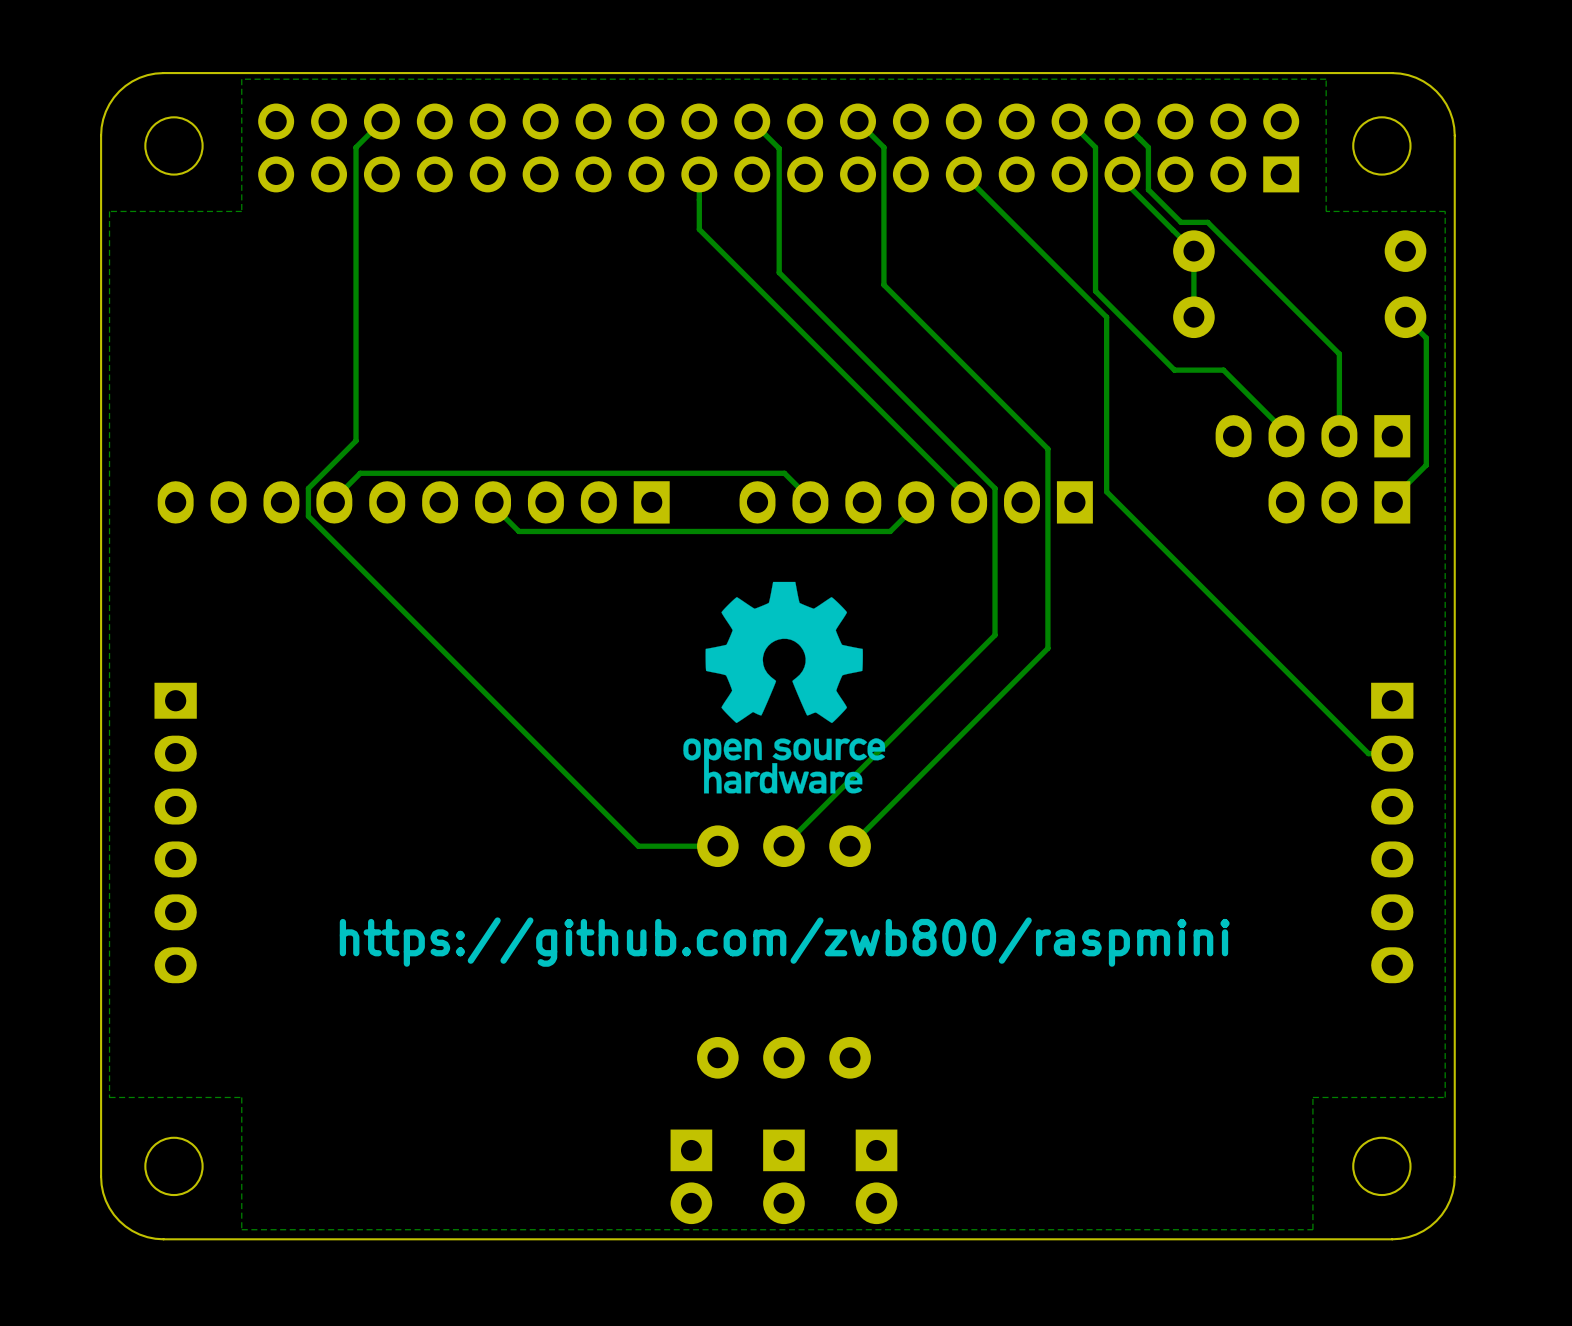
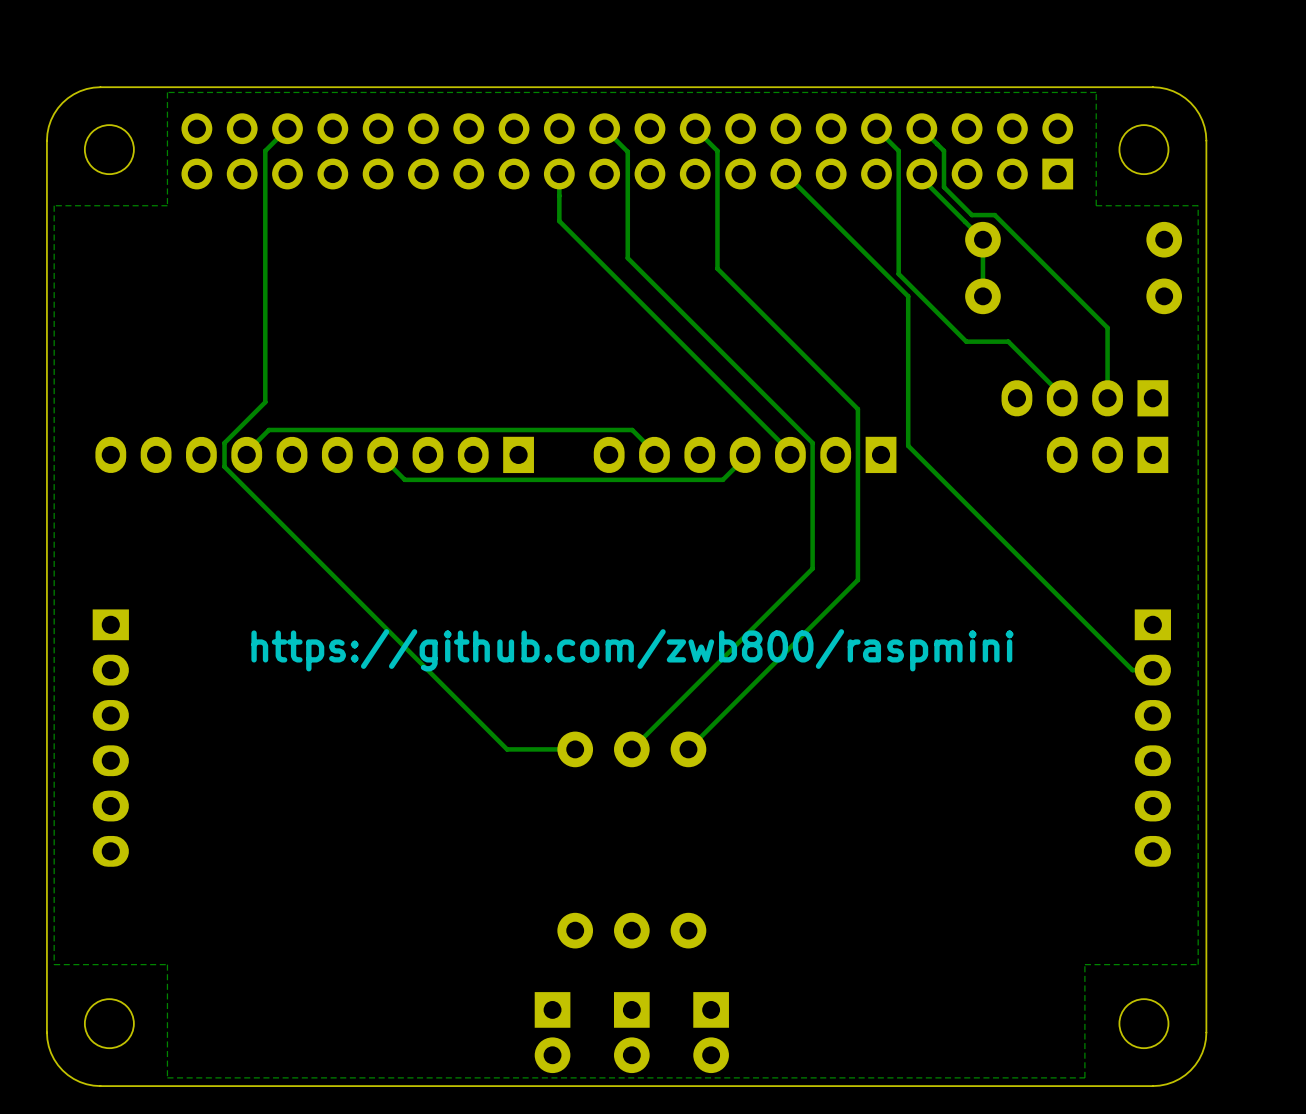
track: (1405, 317) (1426, 338) (1426, 465) (1392, 499) -> none
drawing: [683, 581, 886, 794] -> none
text position: https://github.com/zwb800/raspmini (784, 942) -> https://github.com/zwb800/raspmini (632, 650)

